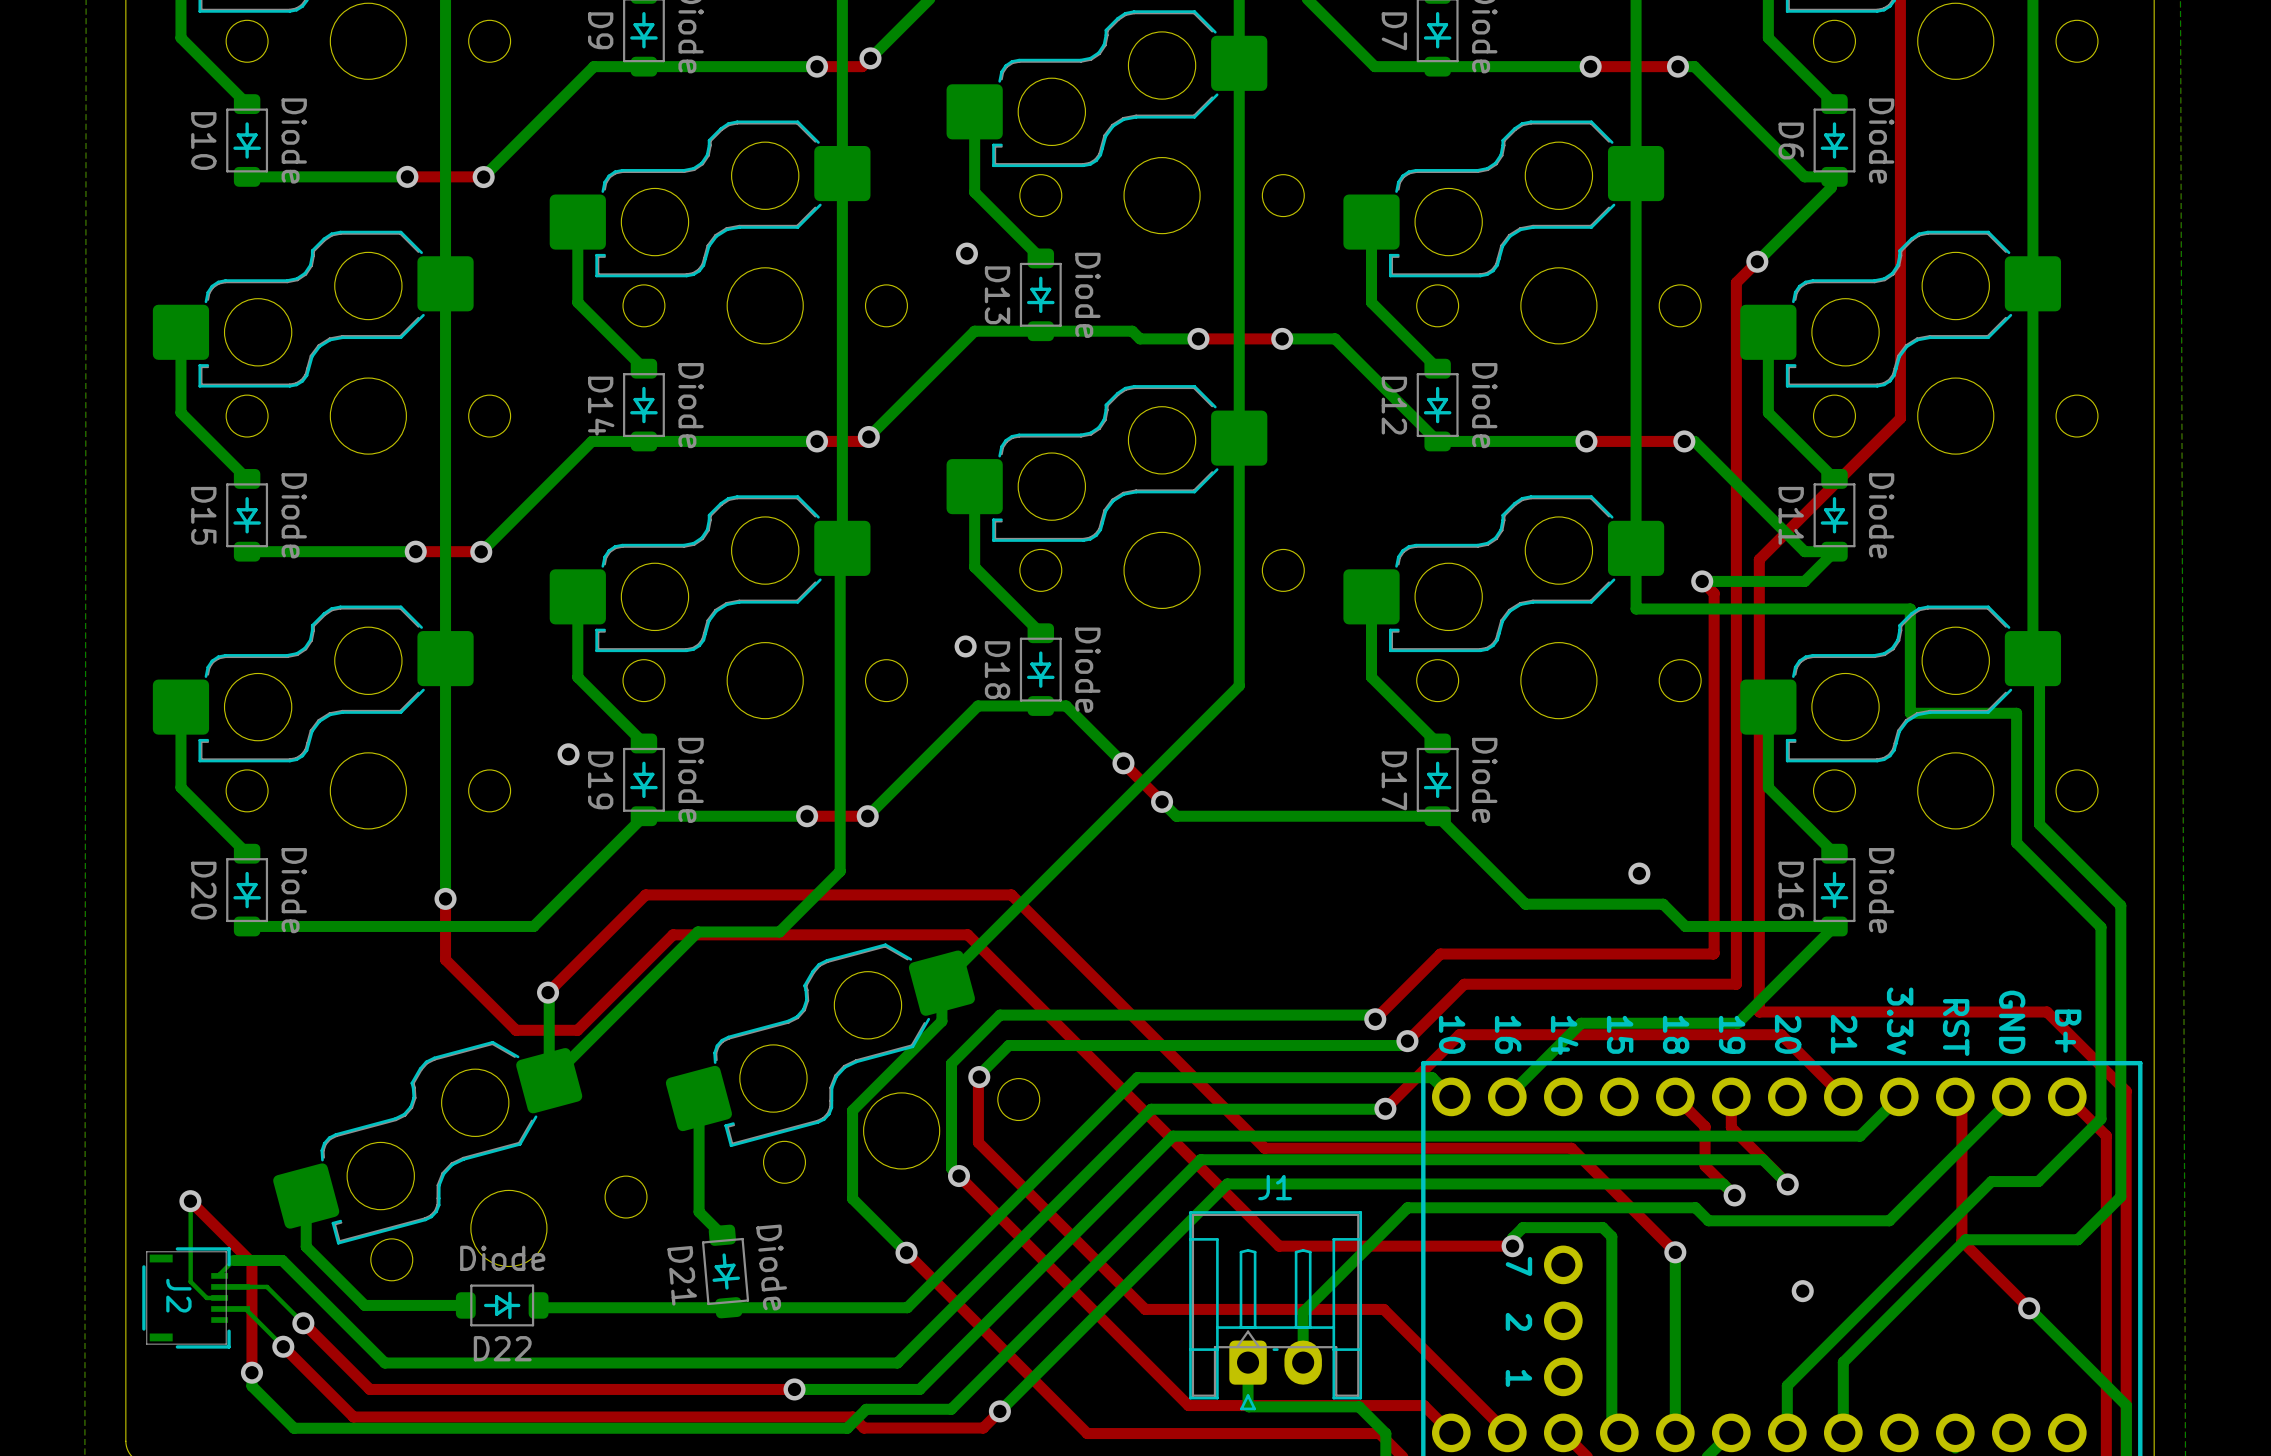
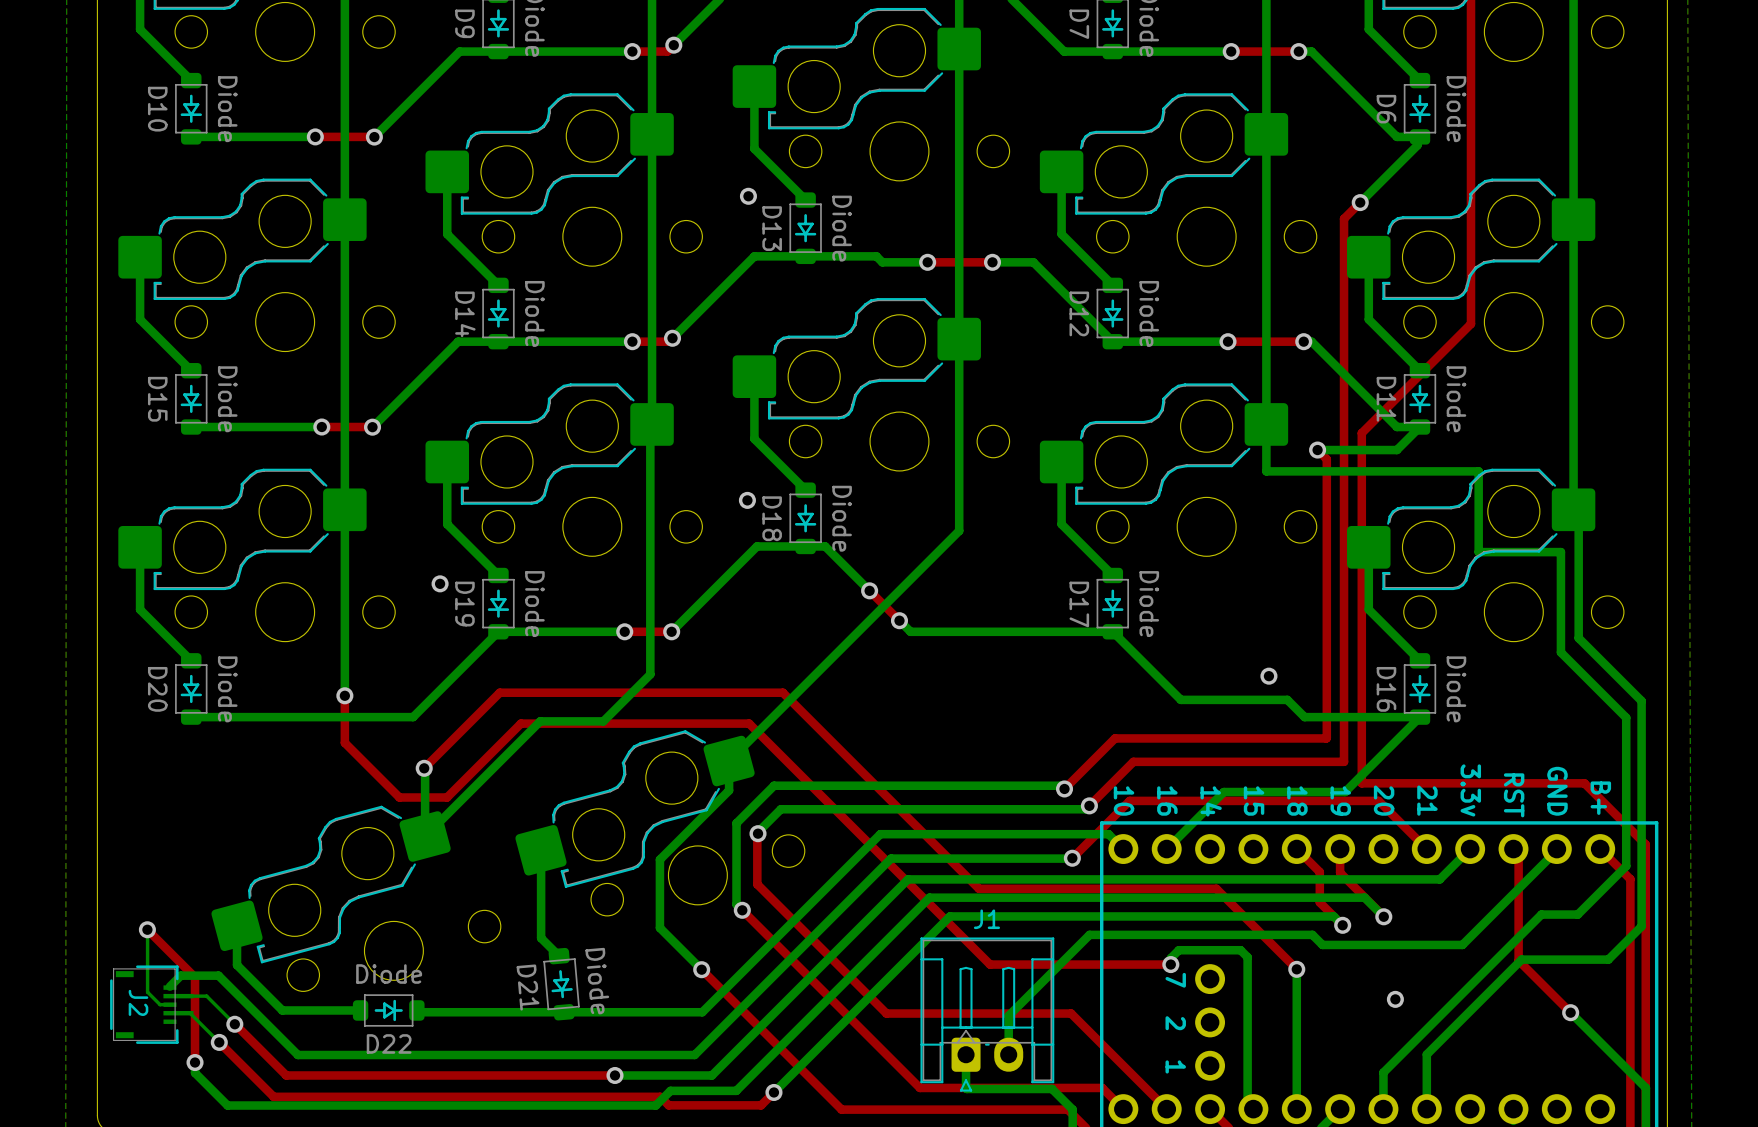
bottom track width: thin (233, 1260) (219, 1274) -> thick (180, 975) (170, 986)

